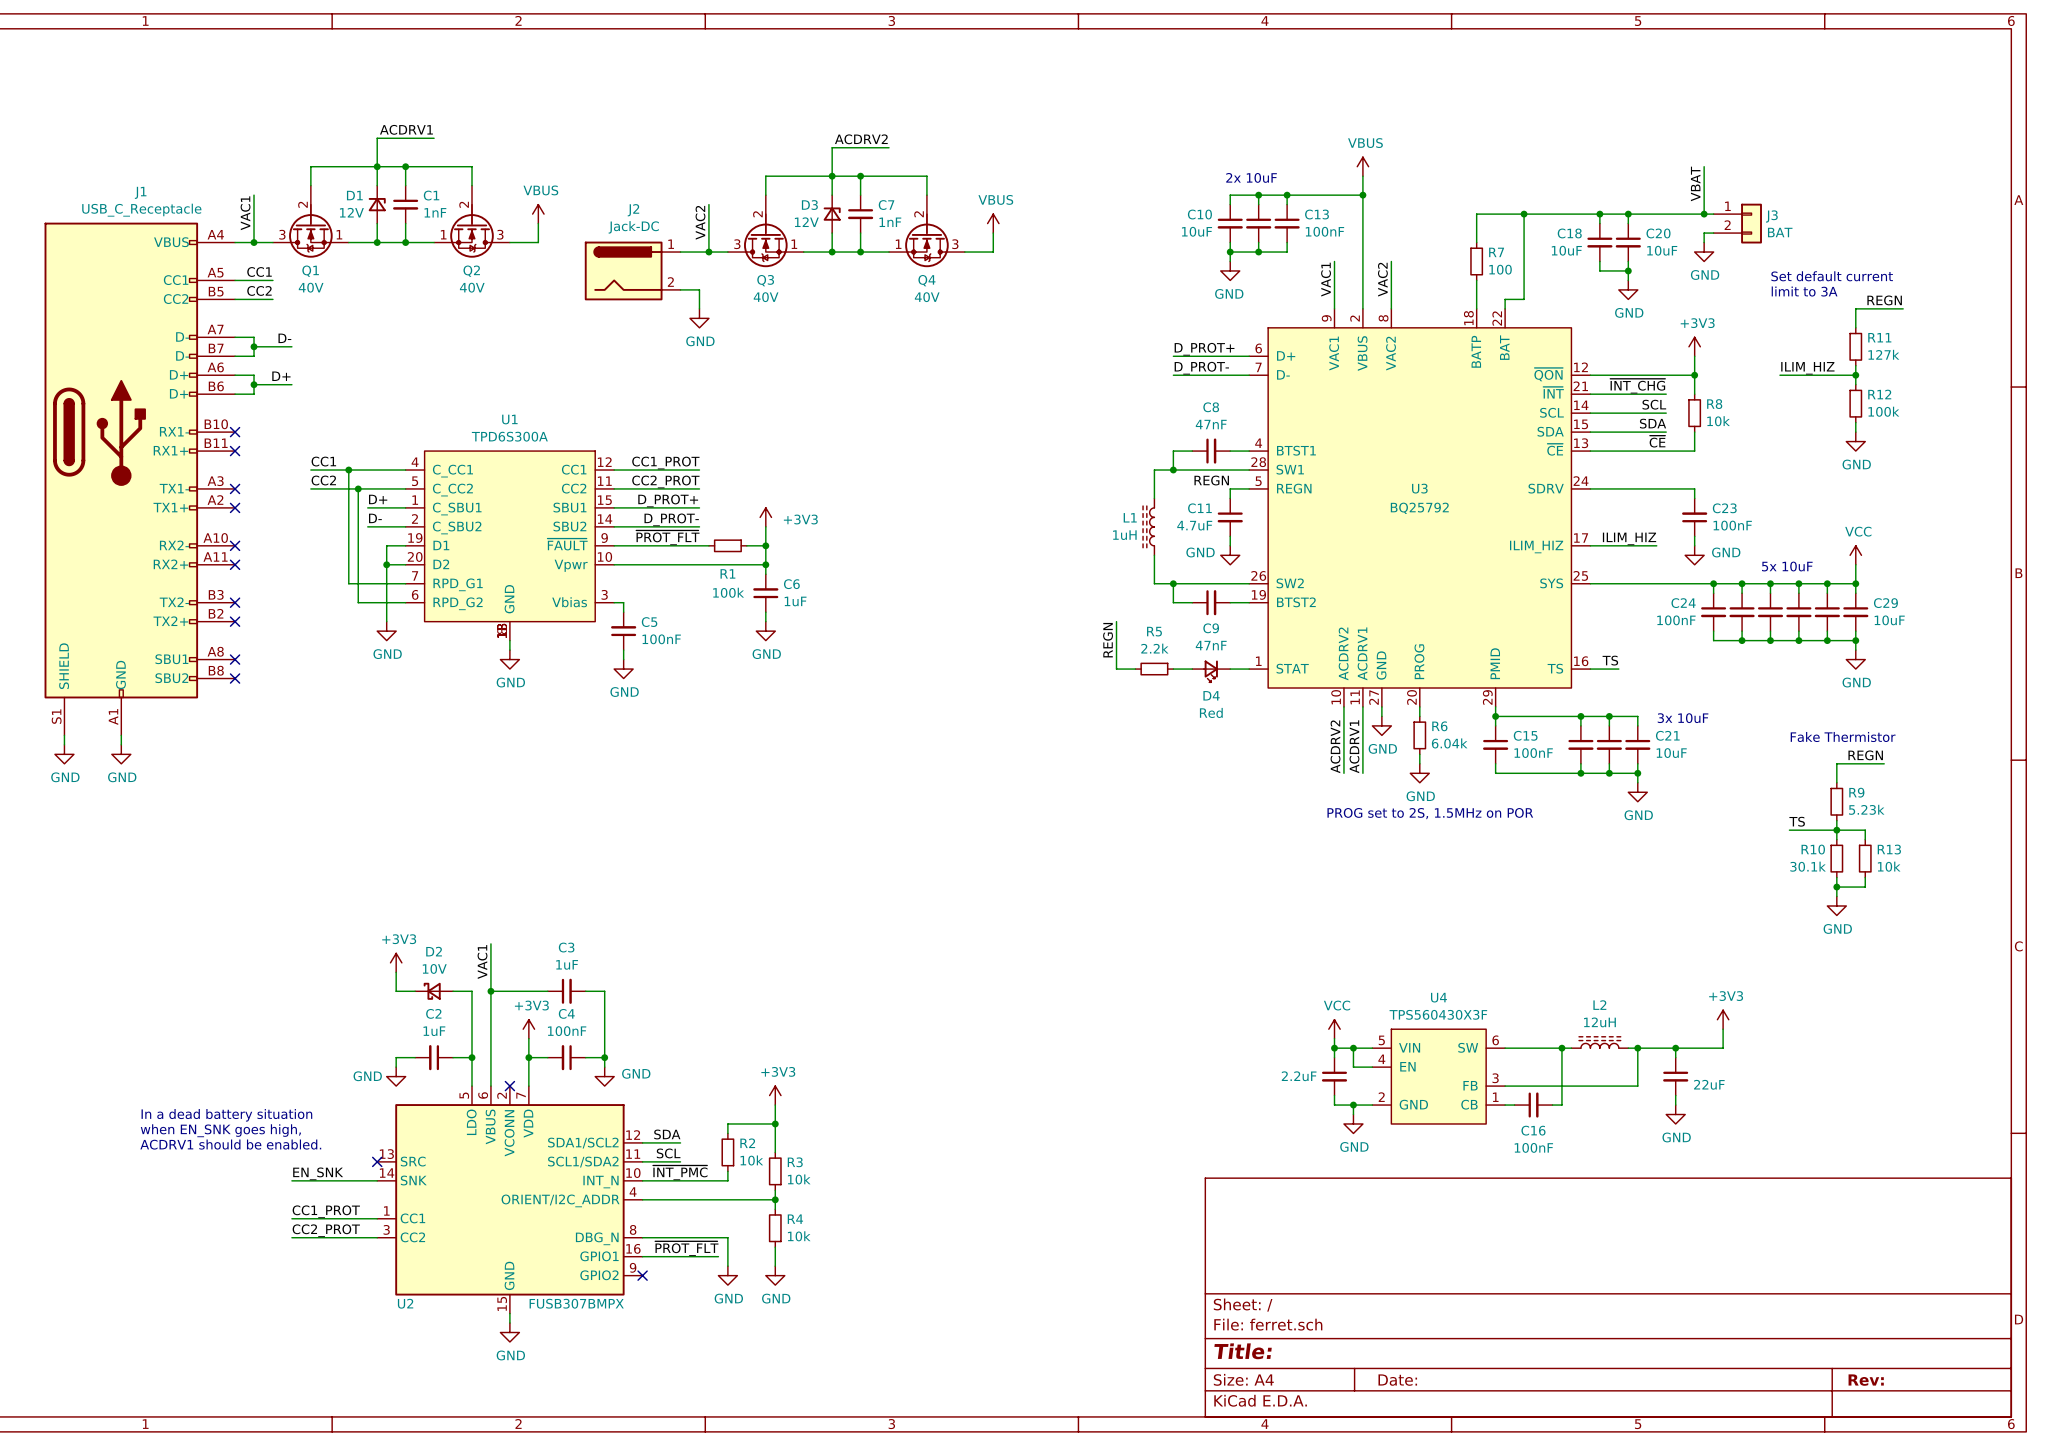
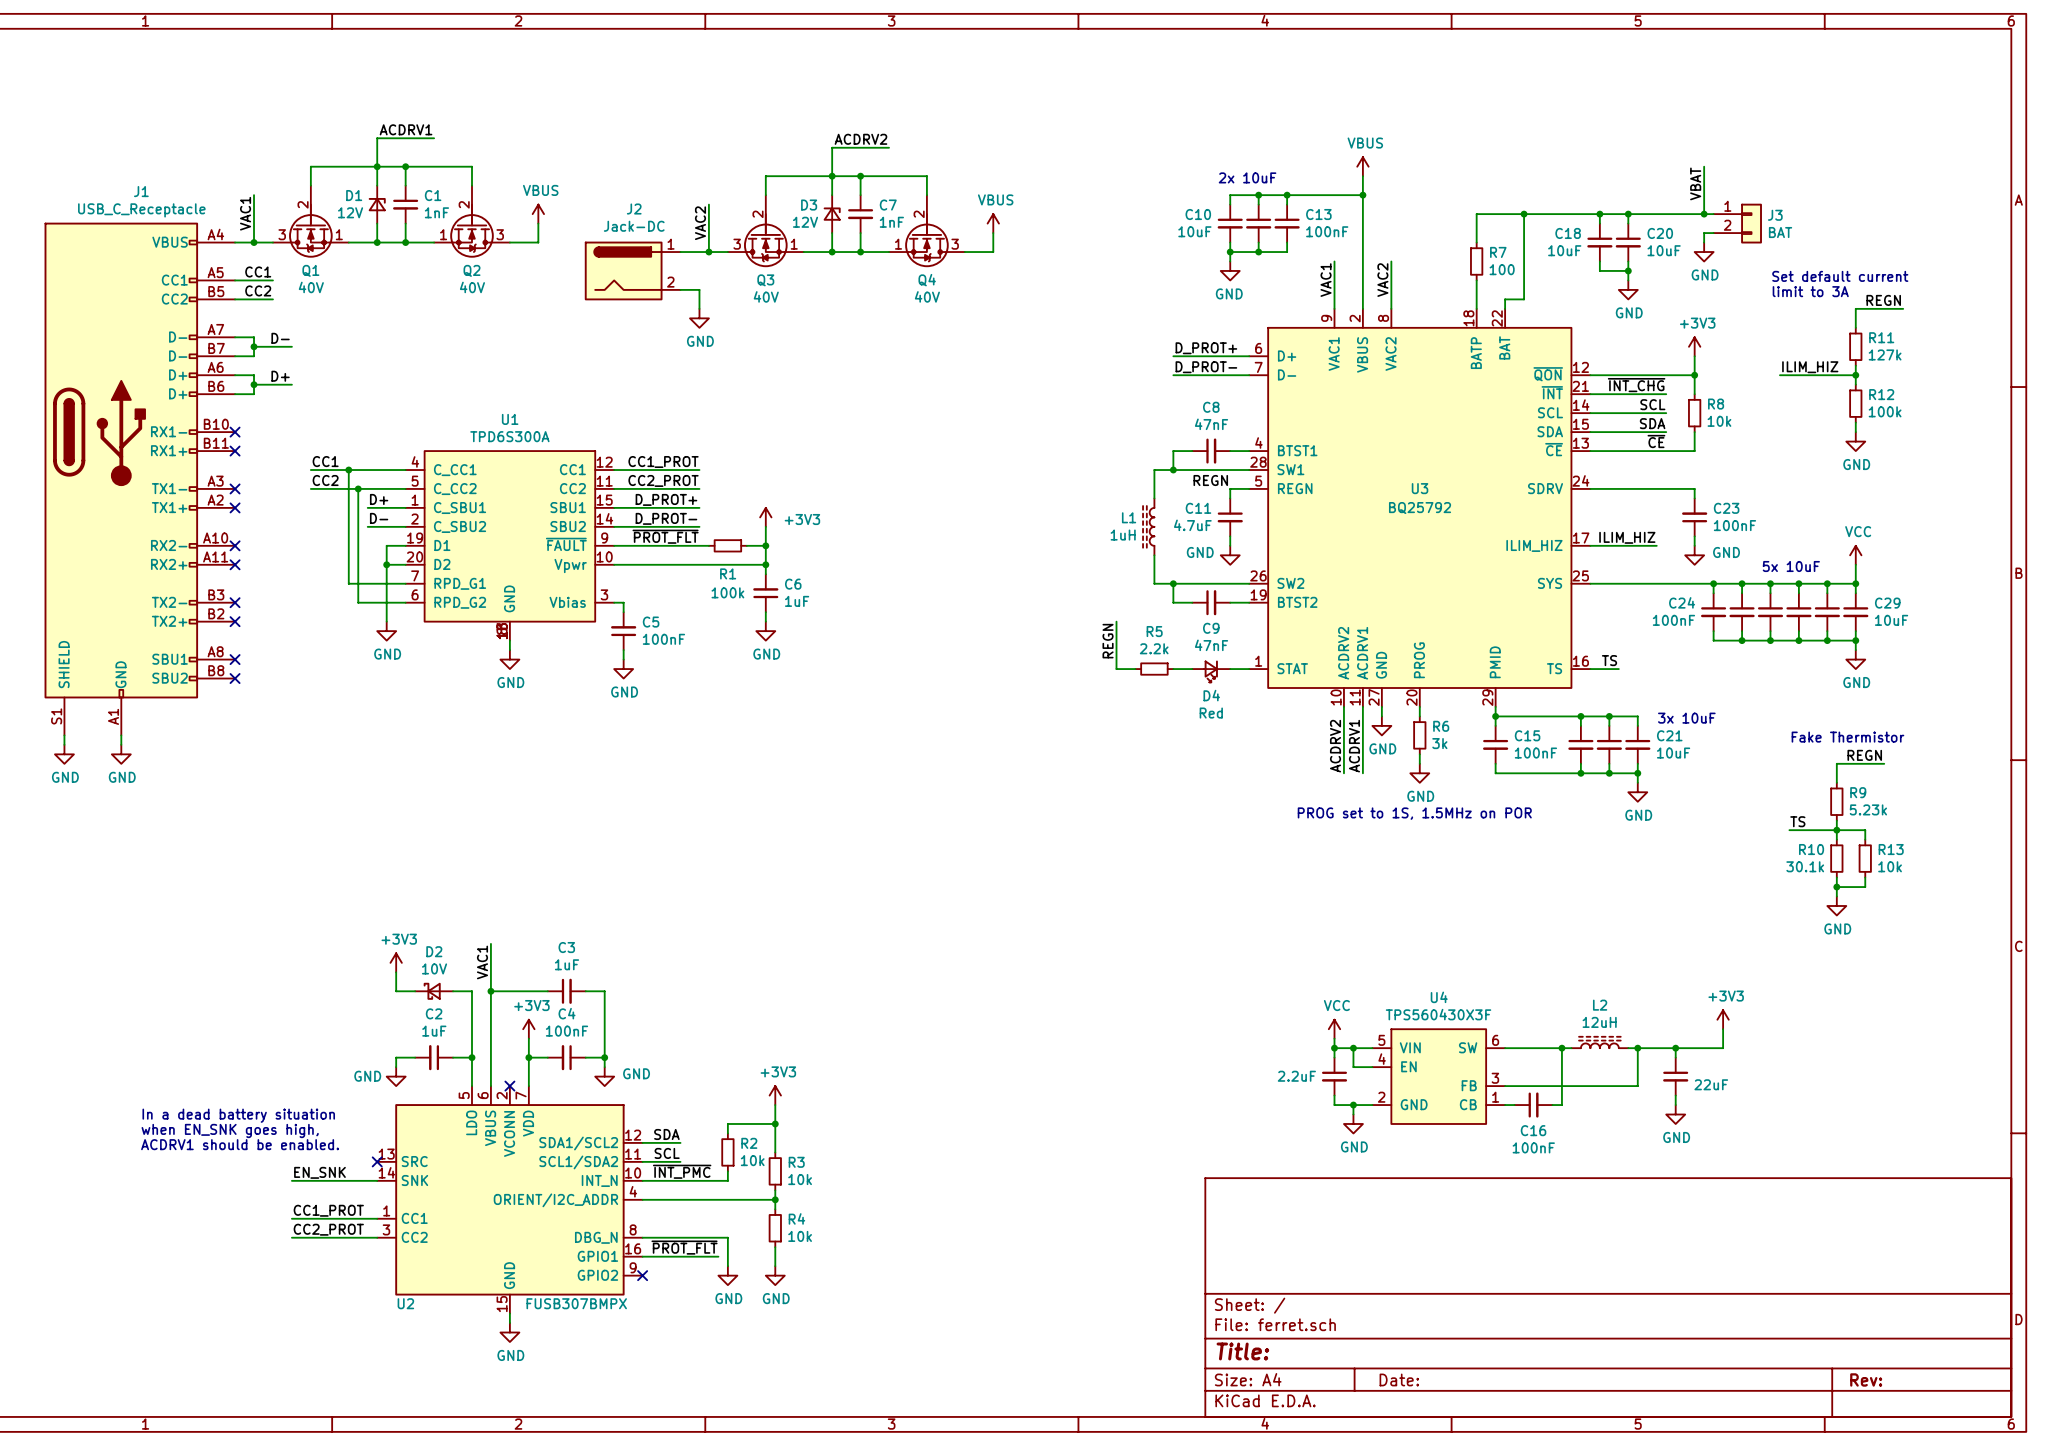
R6 value: 6.04k (1449, 743) -> 3k (1439, 743)
text: PROG set to 2S, 1.5MHz on POR (1430, 813) -> PROG set to 1S, 1.5MHz on POR (1414, 813)

